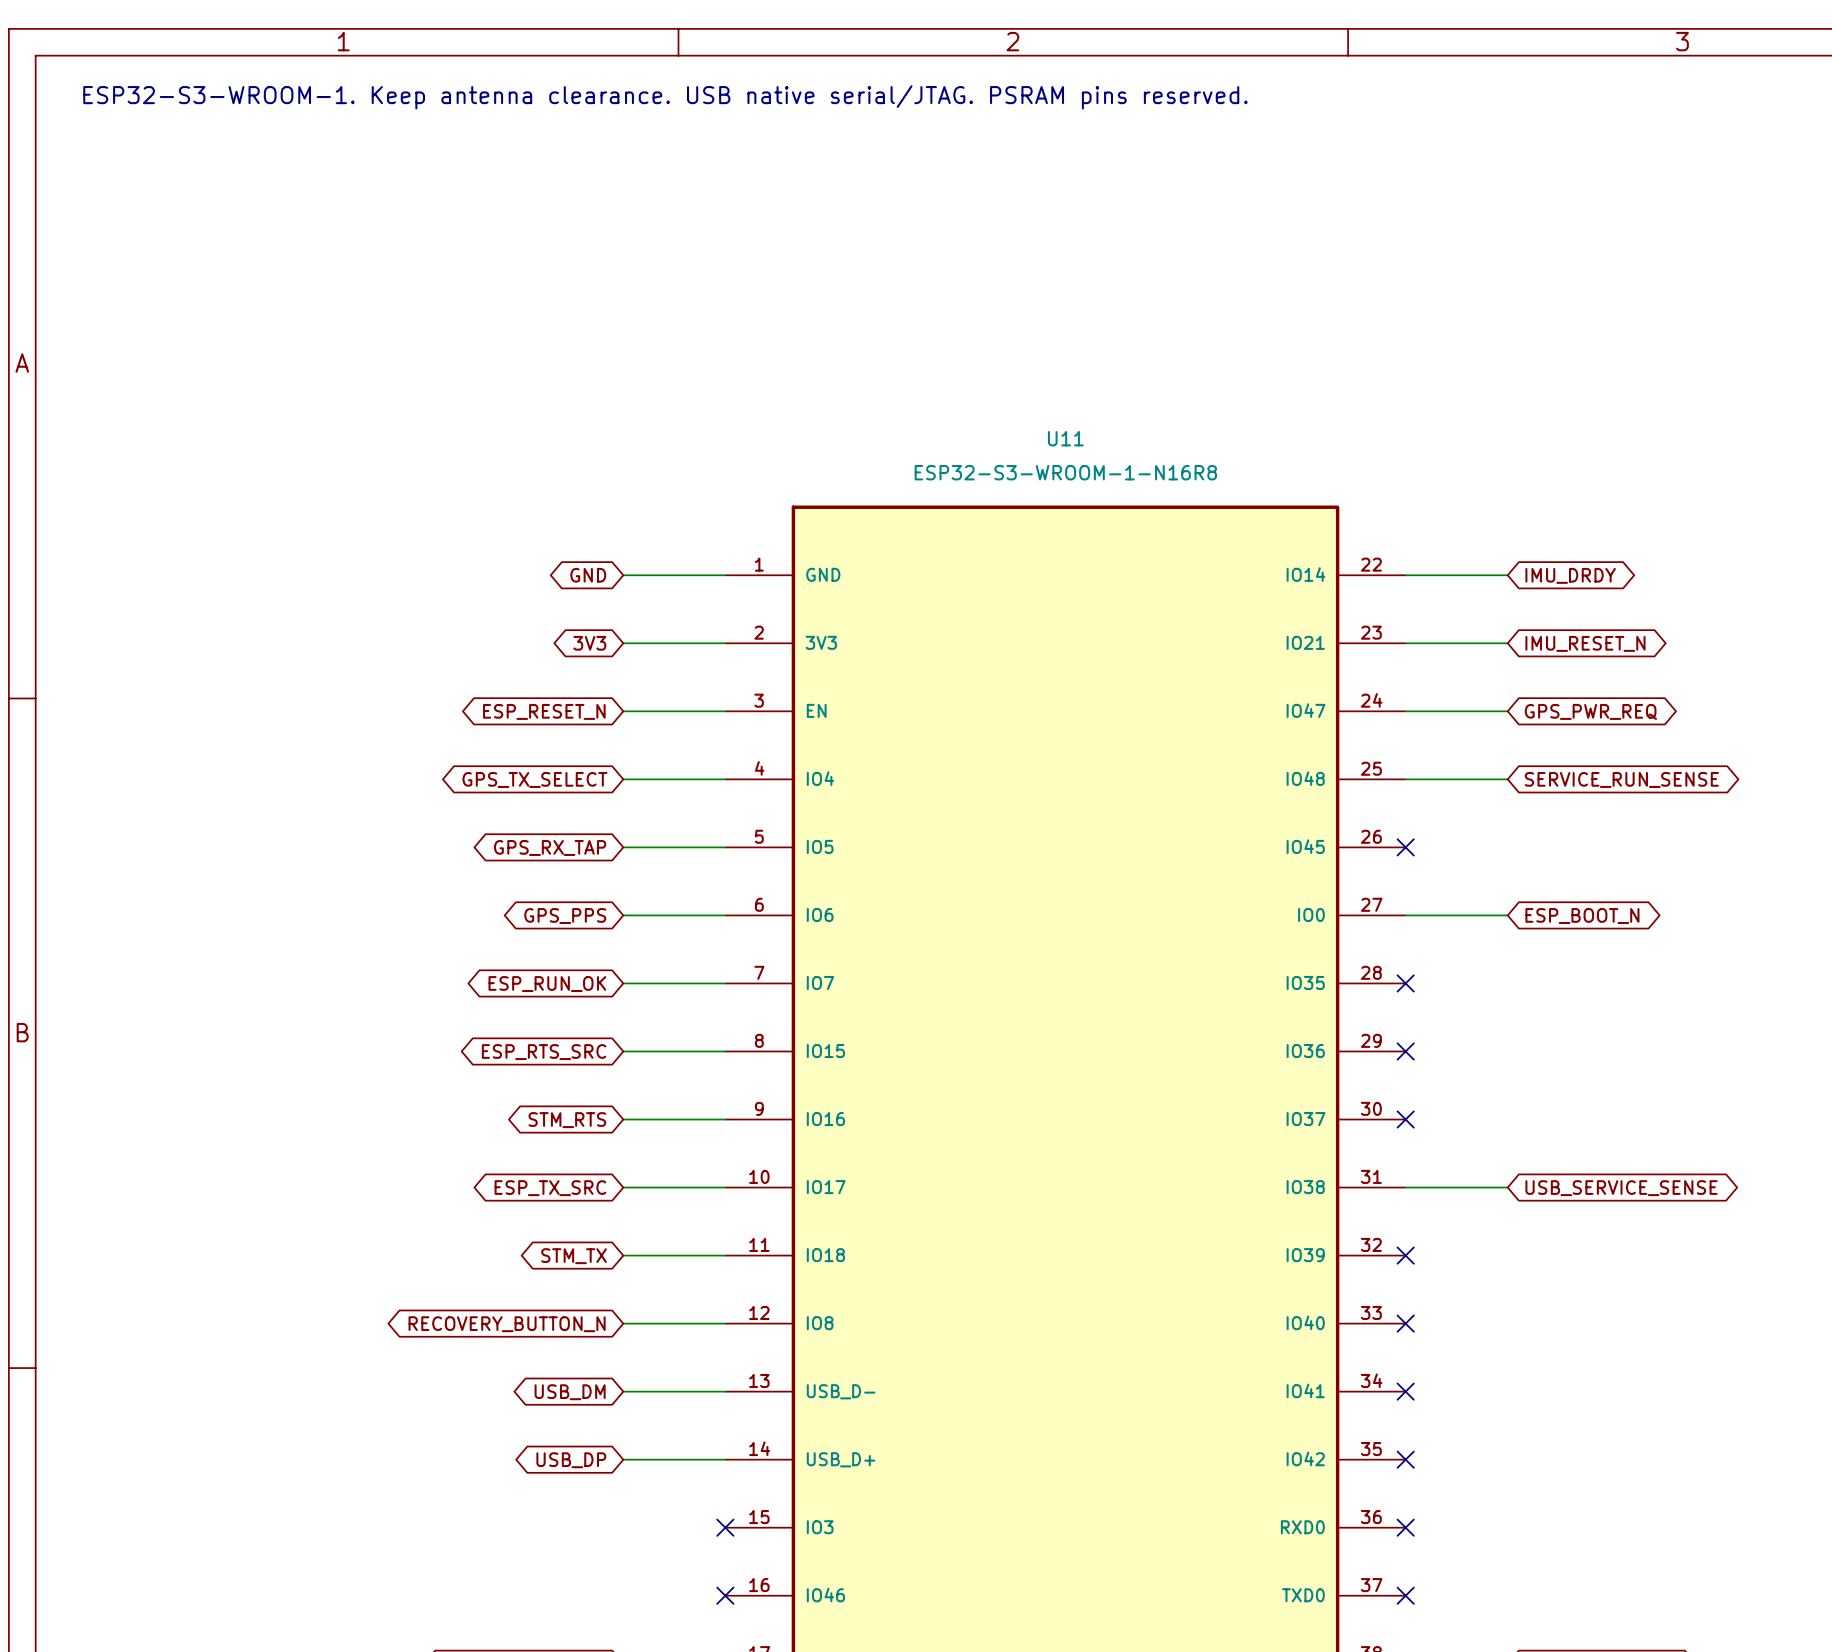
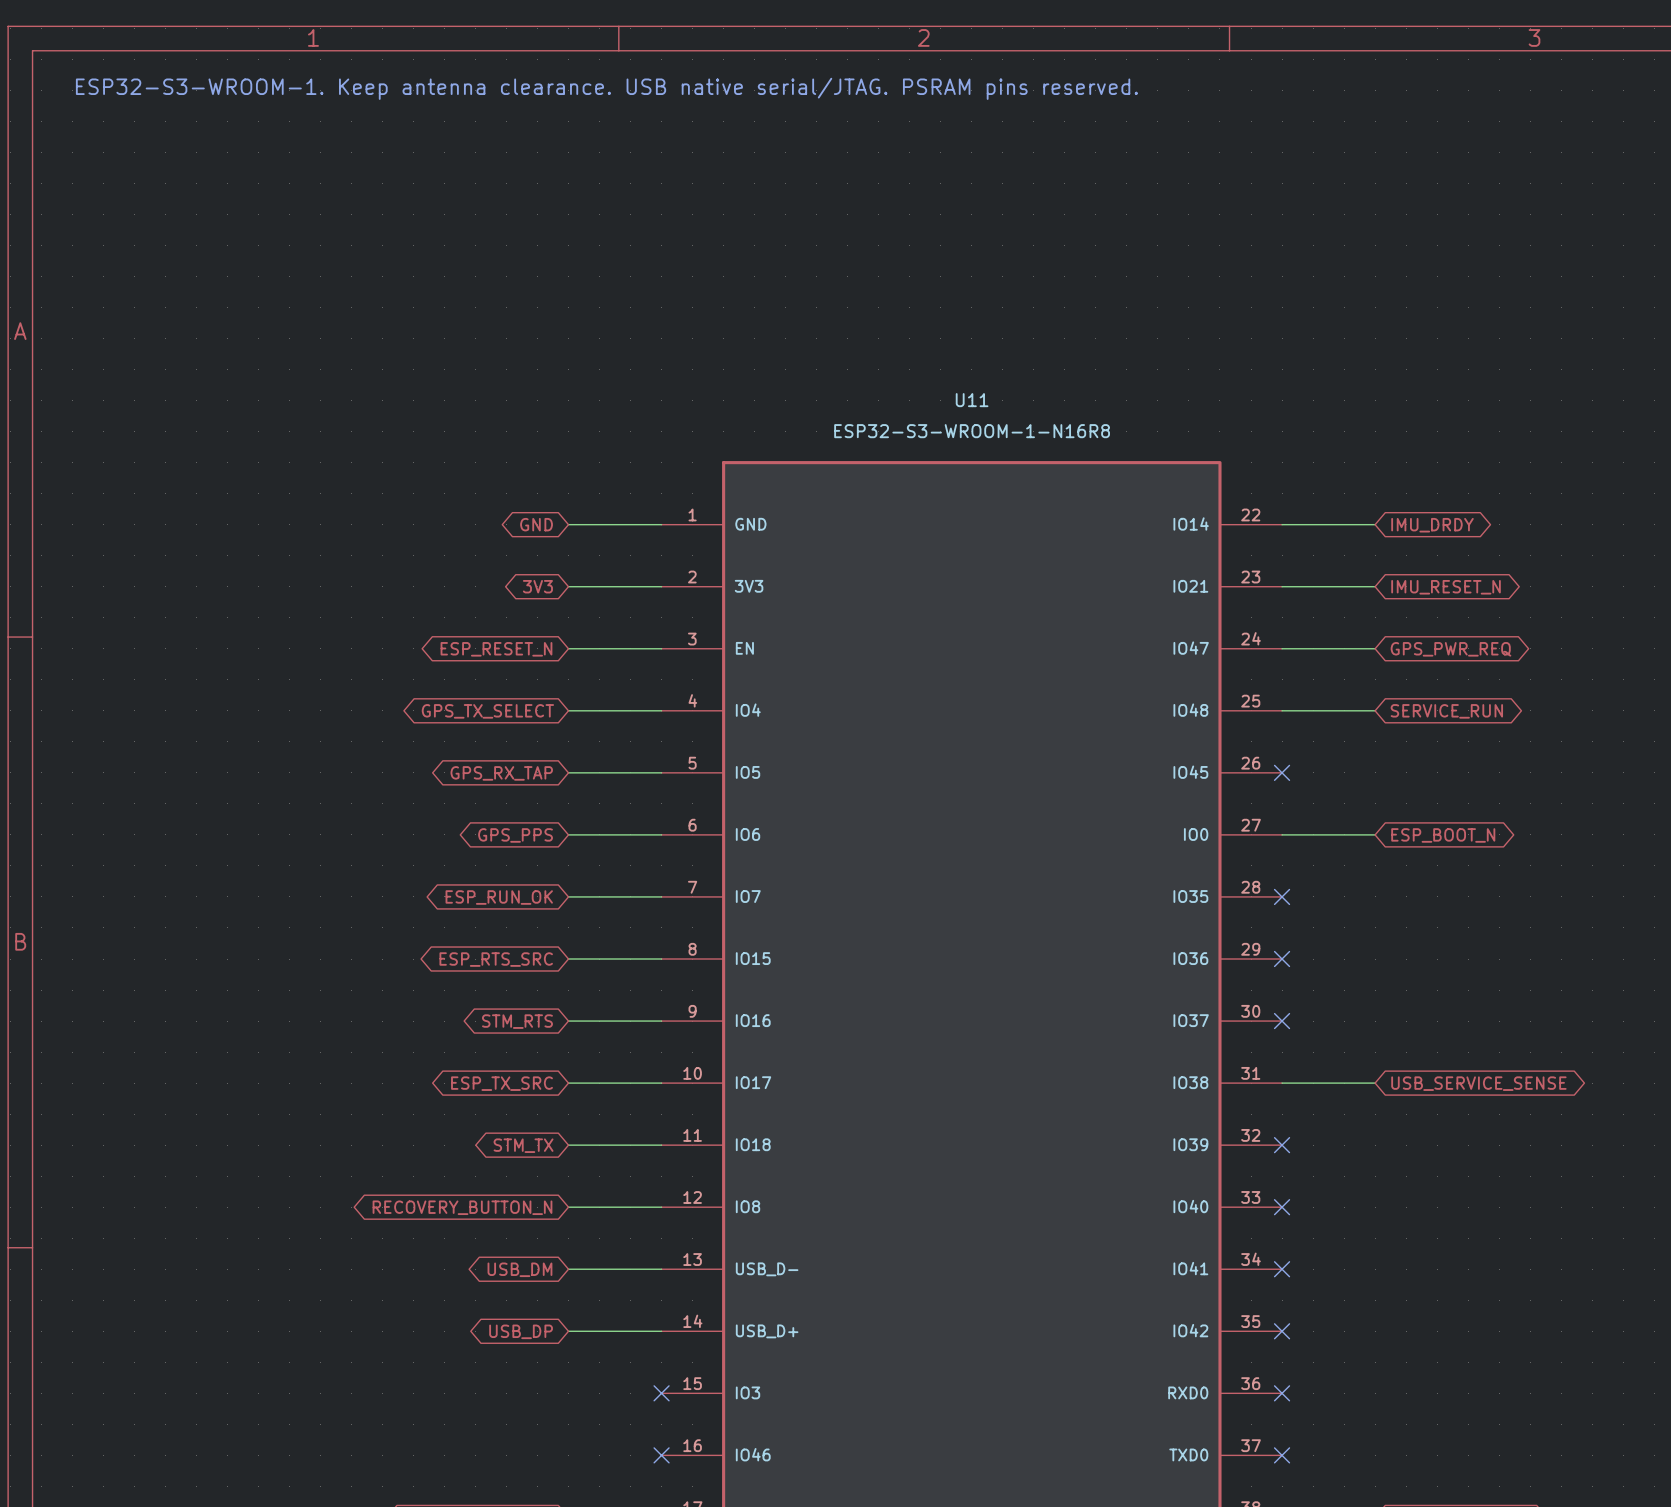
global label: SERVICE_RUN_SENSE (1621, 779) -> SERVICE_RUN (1446, 711)

